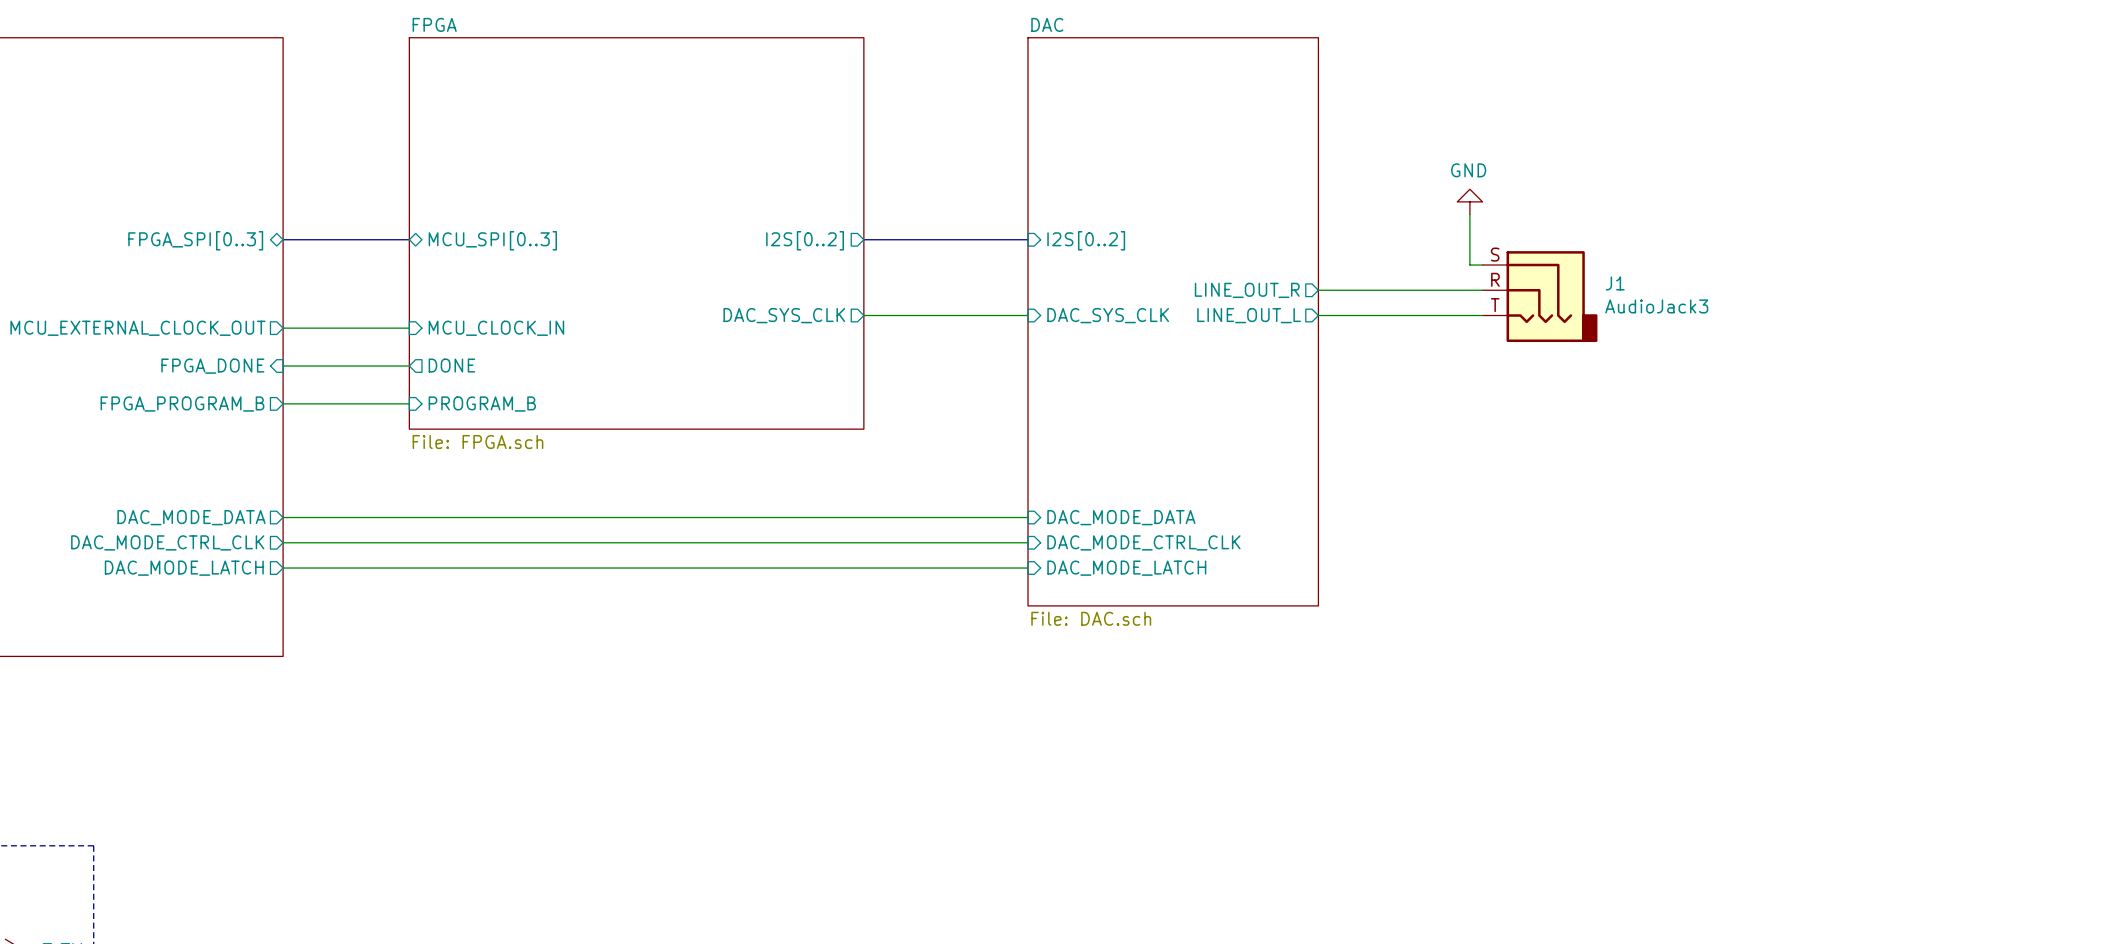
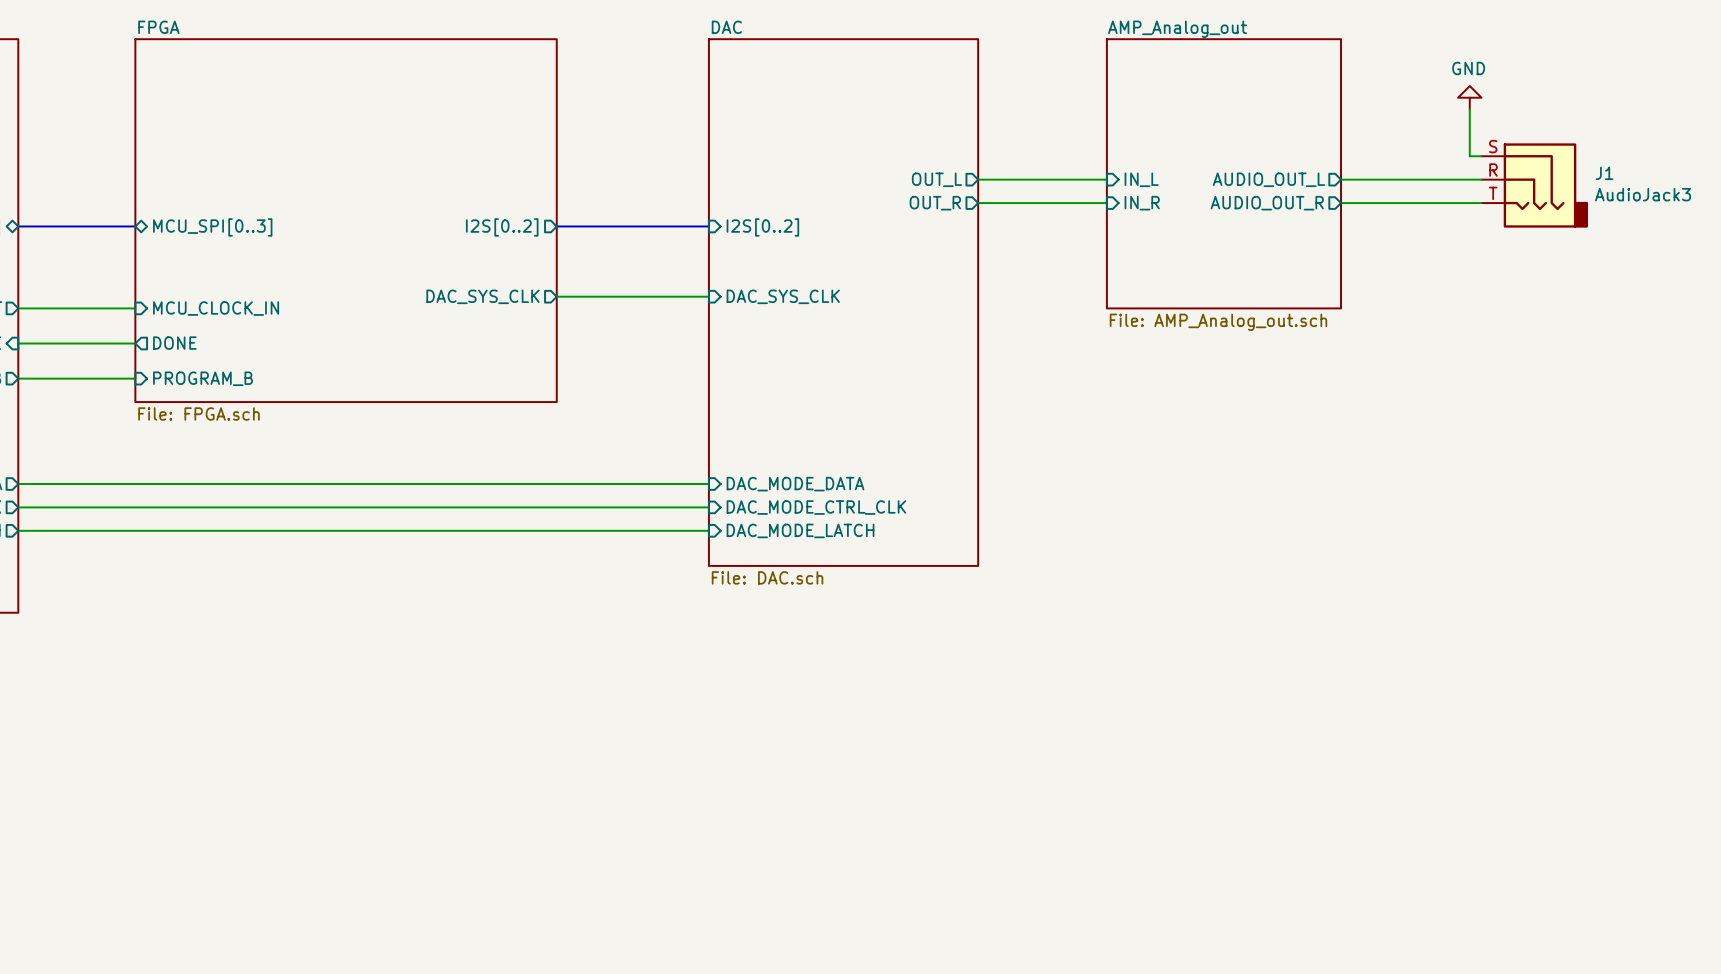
power symbol: none -> GND (1469, 97)
wire: none -> (1469, 109) (1469, 156) (1481, 156)
sheet AMP_Analog_out: none -> File: AMP_Analog_out.sch (1223, 173)
sheet pin: none -> OUT_L (936, 179)
wire: none -> (978, 179) (1106, 179)
sheet pin: none -> IN_L (1141, 179)
sheet pin: none -> AUDIO_OUT_L (1268, 179)
wire: none -> (1341, 179) (1481, 179)
power symbol: GND (1469, 201) -> none
sheet pin: none -> OUT_R (935, 203)
wire: none -> (978, 203) (1106, 203)
wire: (1469, 214) (1469, 265) (1482, 265) -> none
sheet pin: none -> IN_R (1142, 203)
sheet pin: none -> AUDIO_OUT_R (1267, 203)
wire: none -> (1341, 203) (1481, 203)
sheet pin: LINE_OUT_R (1247, 290) -> none
wire: (1318, 290) (1482, 290) -> none
J1 position: (1539, 296) -> (1534, 185)
sheet pin: LINE_OUT_L (1249, 315) -> none
wire: (1318, 315) (1482, 315) -> none

